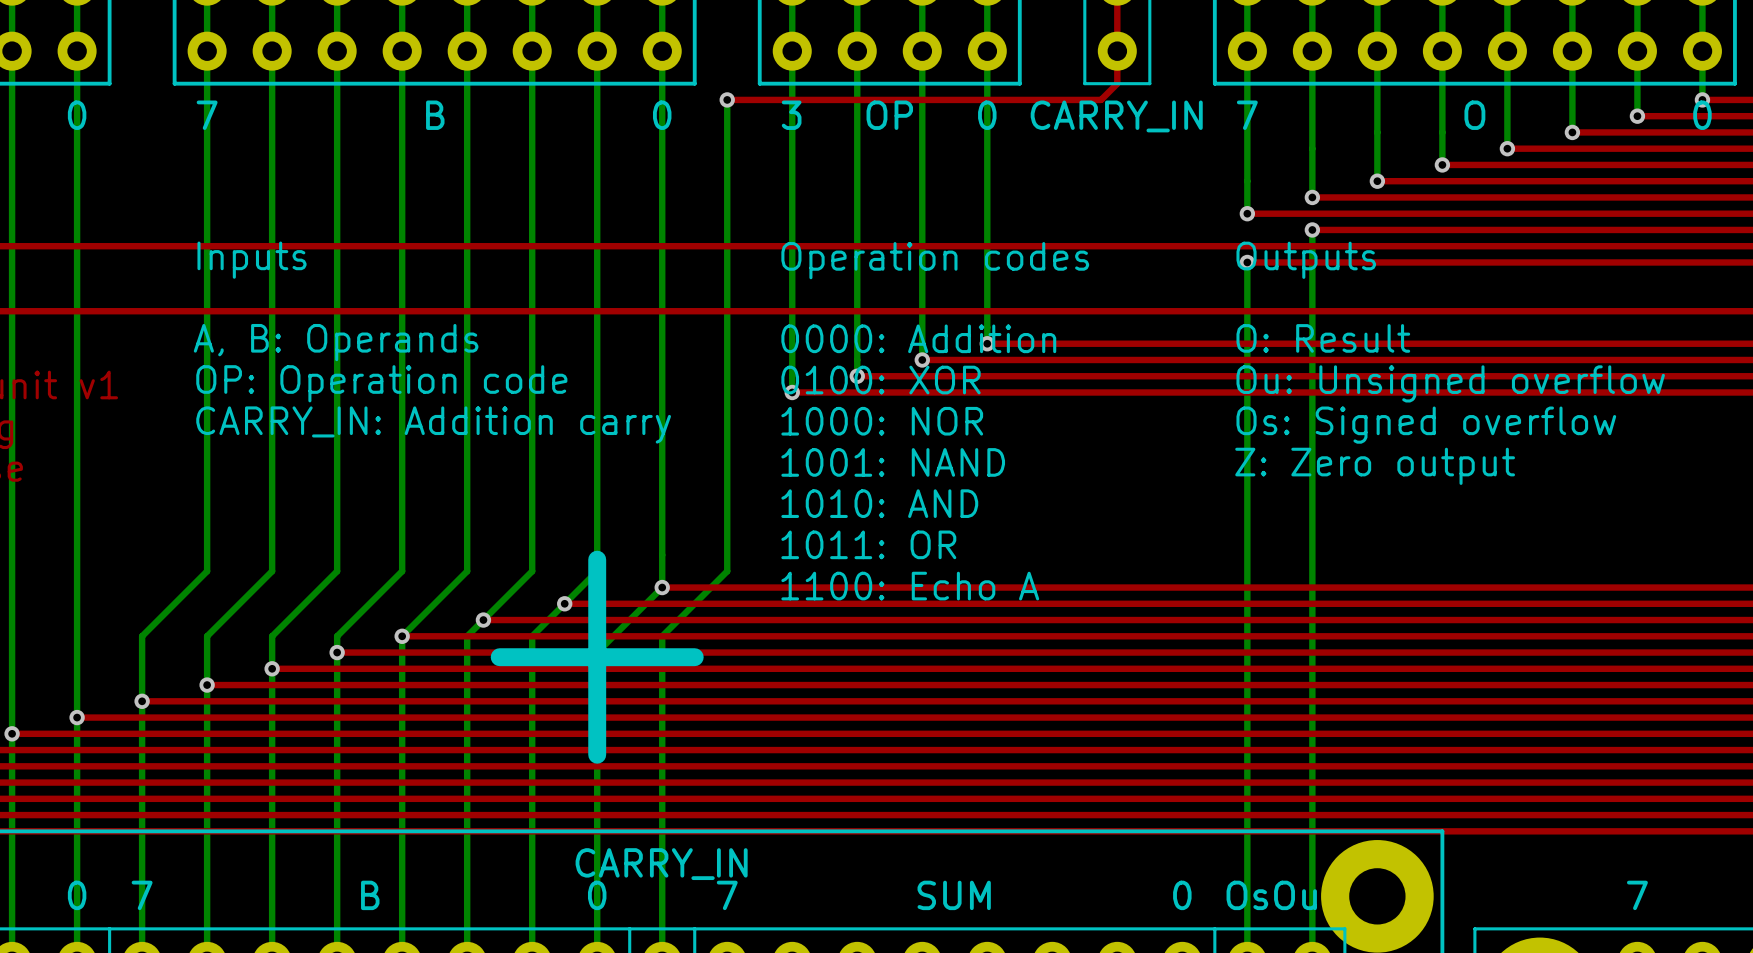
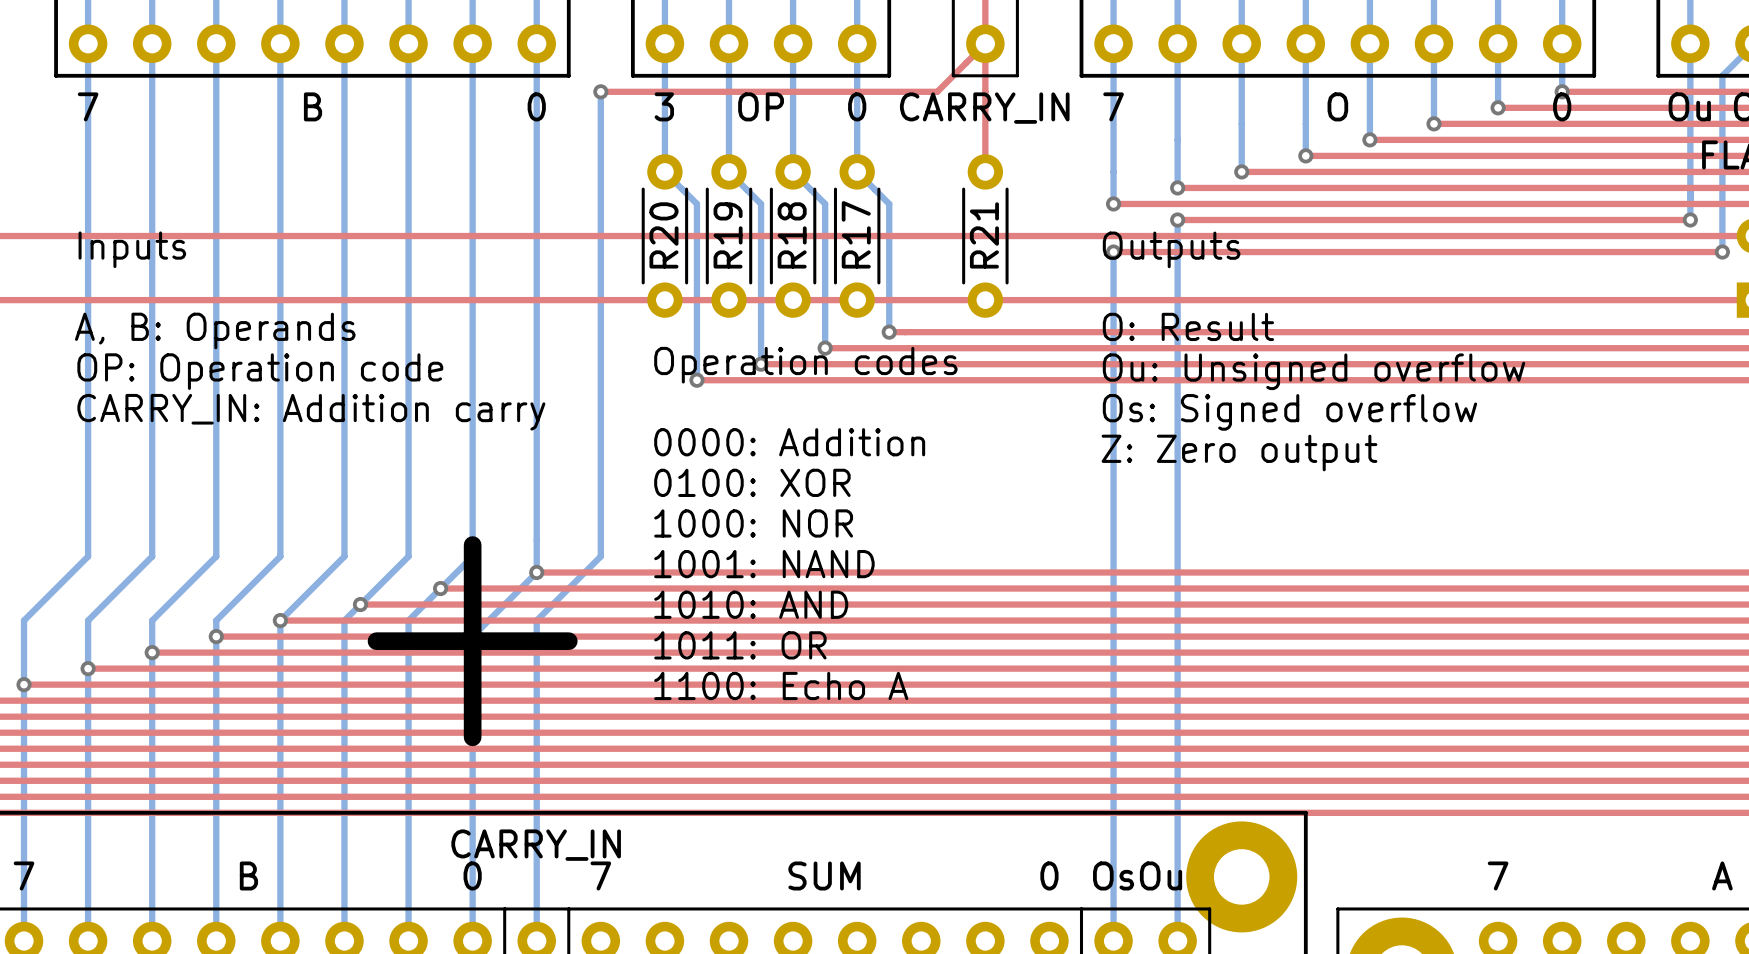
top track: (1117, 83) (1101, 99) (1068, 99) -> (985, 43) (937, 91)
top track: none -> (985, 75) (985, 171)
bottom track: (792, 181) (792, 392) -> (664, 171) (696, 203) (696, 380)
bottom track: (857, 181) (857, 376) -> (729, 171) (761, 203) (761, 364)
bottom track: (922, 181) (922, 359) -> (793, 171) (825, 203) (825, 348)
bottom track: (987, 181) (987, 343) -> (857, 171) (889, 203) (889, 332)
R20: none -> (664, 236)
R19: none -> (729, 236)
R18: none -> (793, 236)
R17: none -> (857, 236)
R21: none -> (985, 236)
text position: Operation codes (935, 260) -> Operation codes (805, 365)
text position: 0000: Addition (918, 338) -> 0000: Addition (789, 442)
top track: (987, 343) (1019, 343) -> none
via: (987, 343) -> none
via: none -> (889, 332)
top track: (922, 359) (954, 359) -> none
via: (922, 359) -> none
via: none -> (825, 348)
top track: (857, 376) (889, 376) -> none
via: (857, 376) -> none
via: none -> (761, 364)
text position: 0100: XOR (881, 380) -> 0100: XOR (752, 482)
top track: (792, 392) (824, 392) -> none
via: (792, 392) -> none
via: none -> (696, 380)
text position: 1000: NOR (882, 421) -> 1000: NOR (753, 523)
text position: 1001: NAND (893, 462) -> 1001: NAND (764, 564)
text position: 1010: AND (879, 503) -> 1010: AND (751, 604)
text position: 1011: OR (868, 544) -> 1011: OR (740, 645)
text position: 1100: Echo A (910, 586) -> 1100: Echo A (781, 685)

